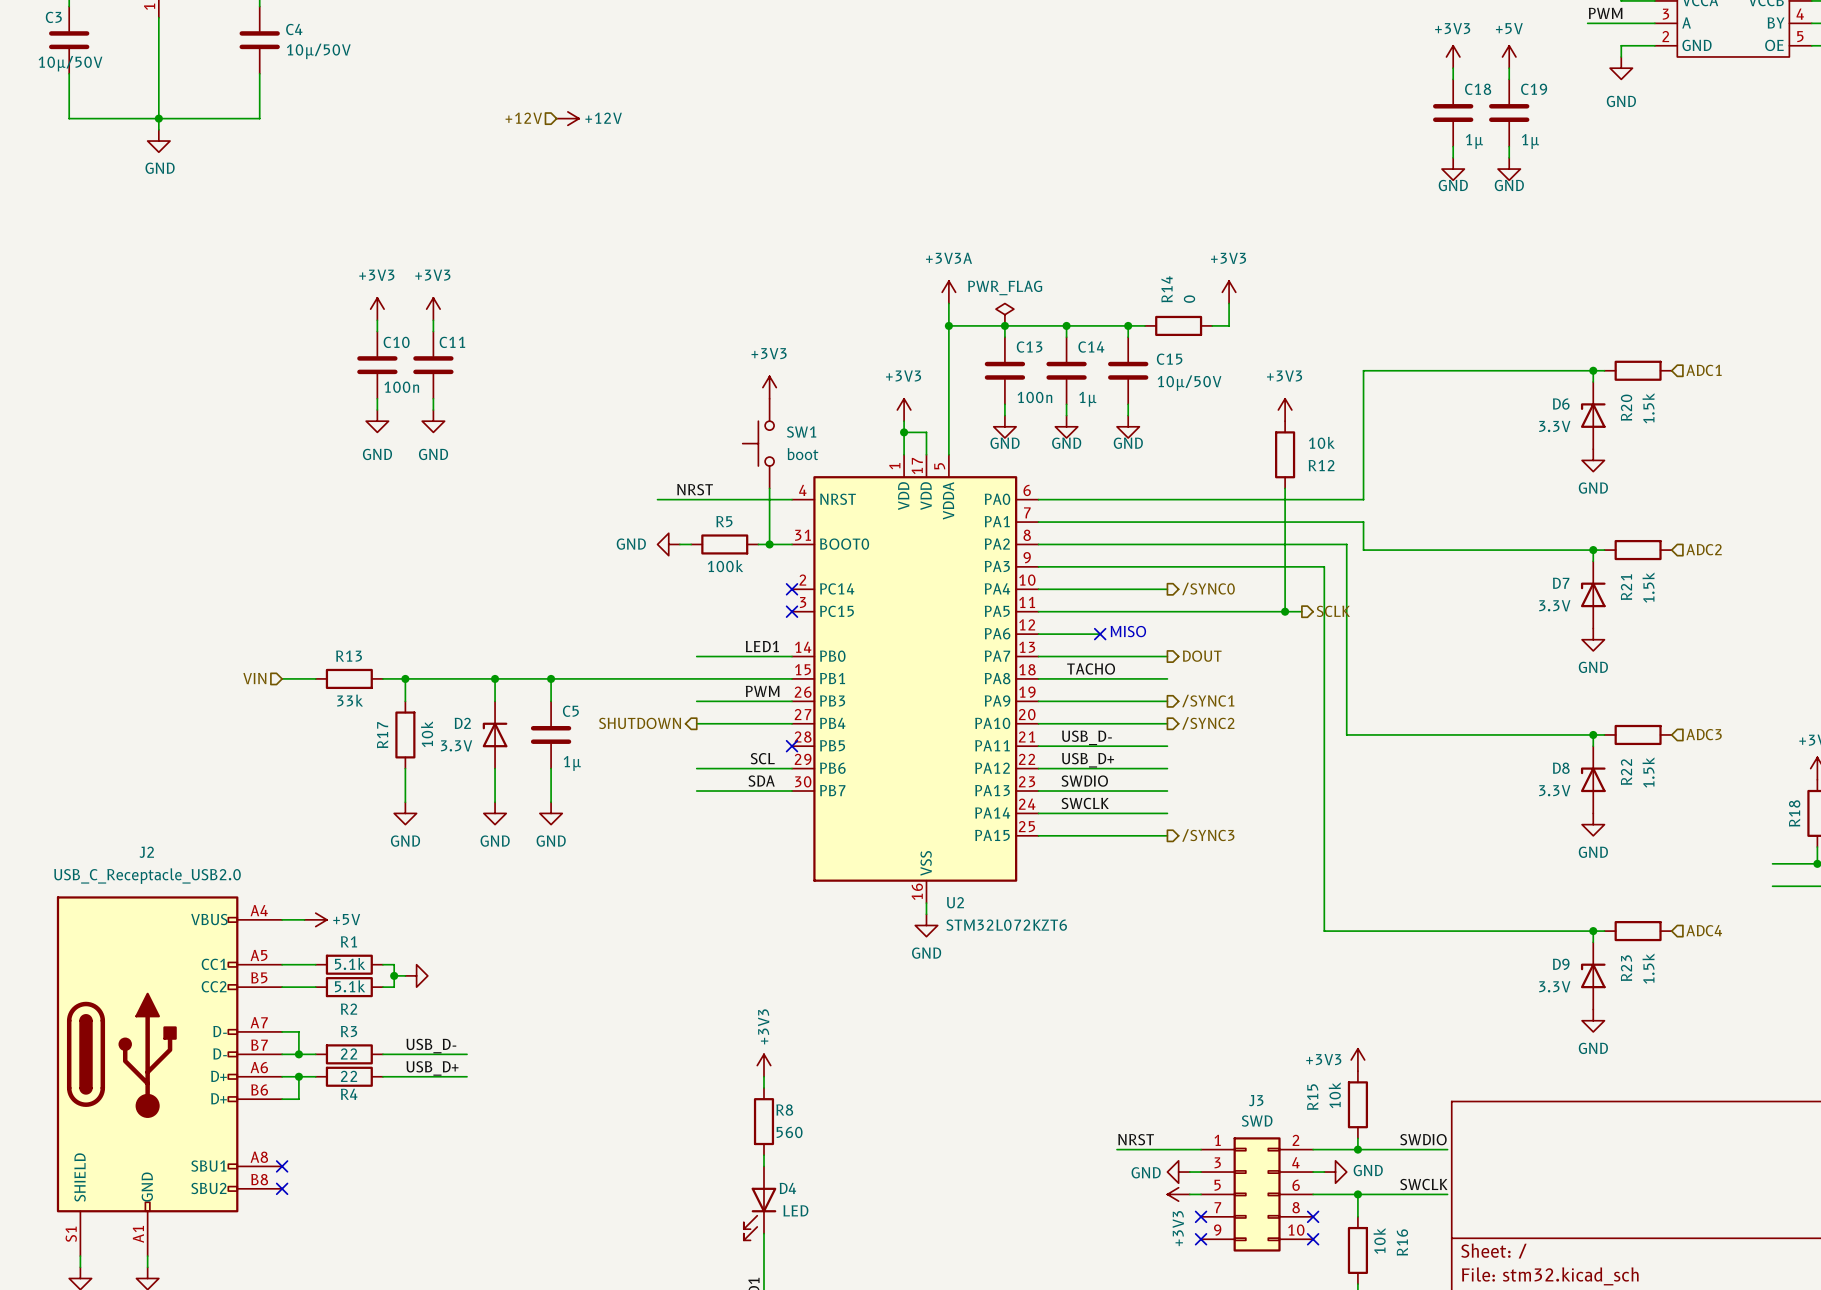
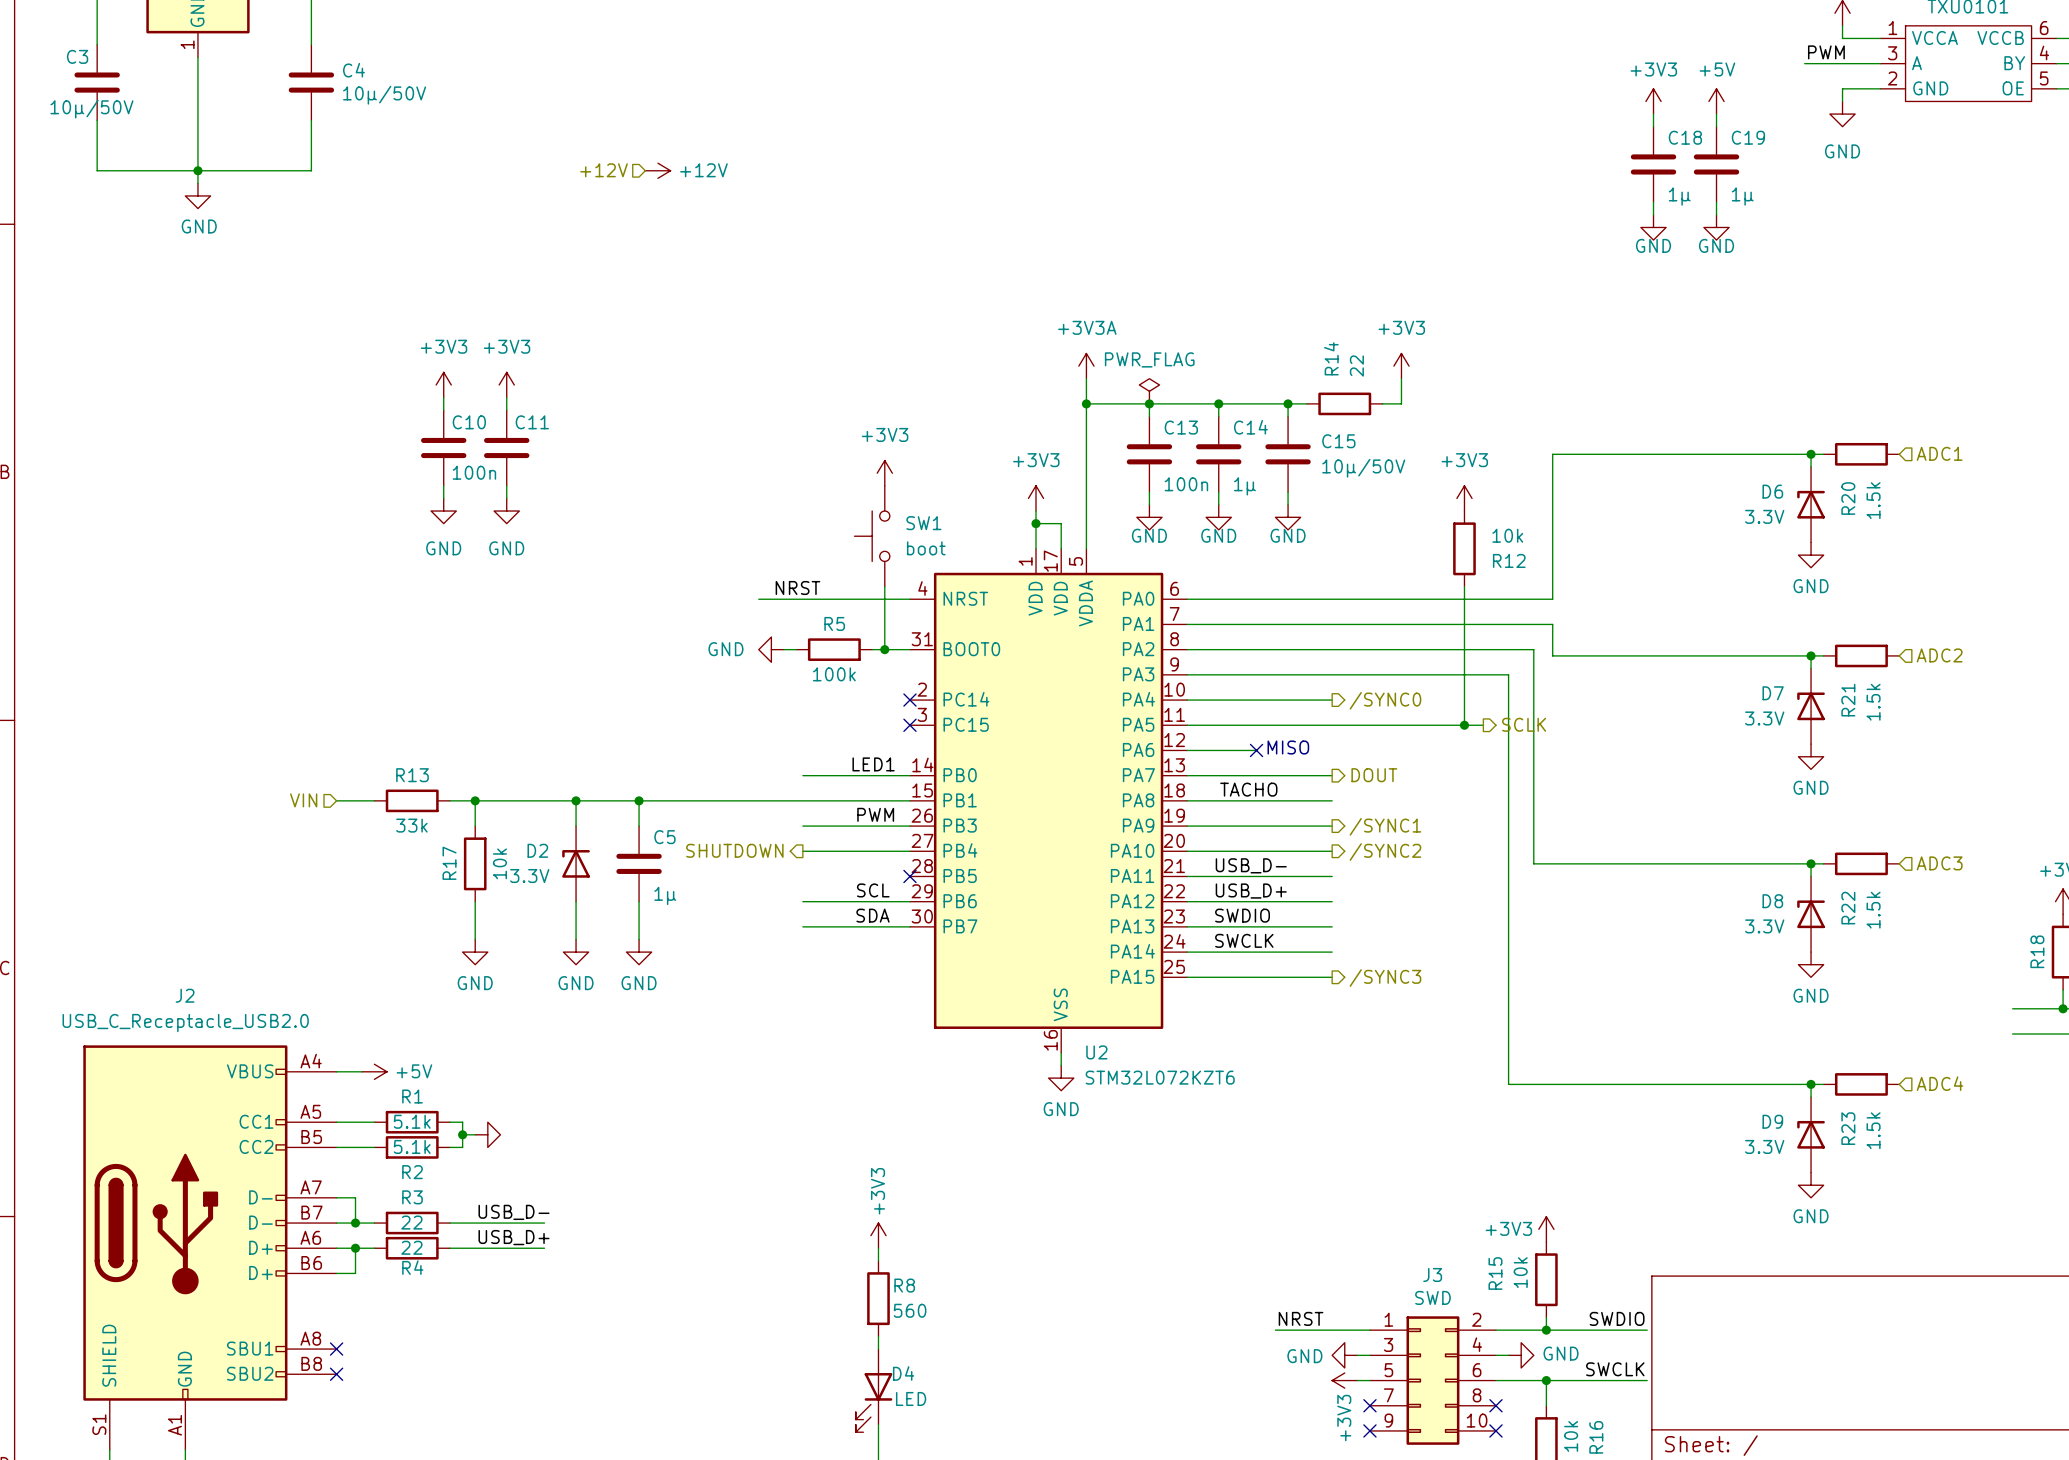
R14 value: 0 (1189, 299) -> 22 (1356, 366)

